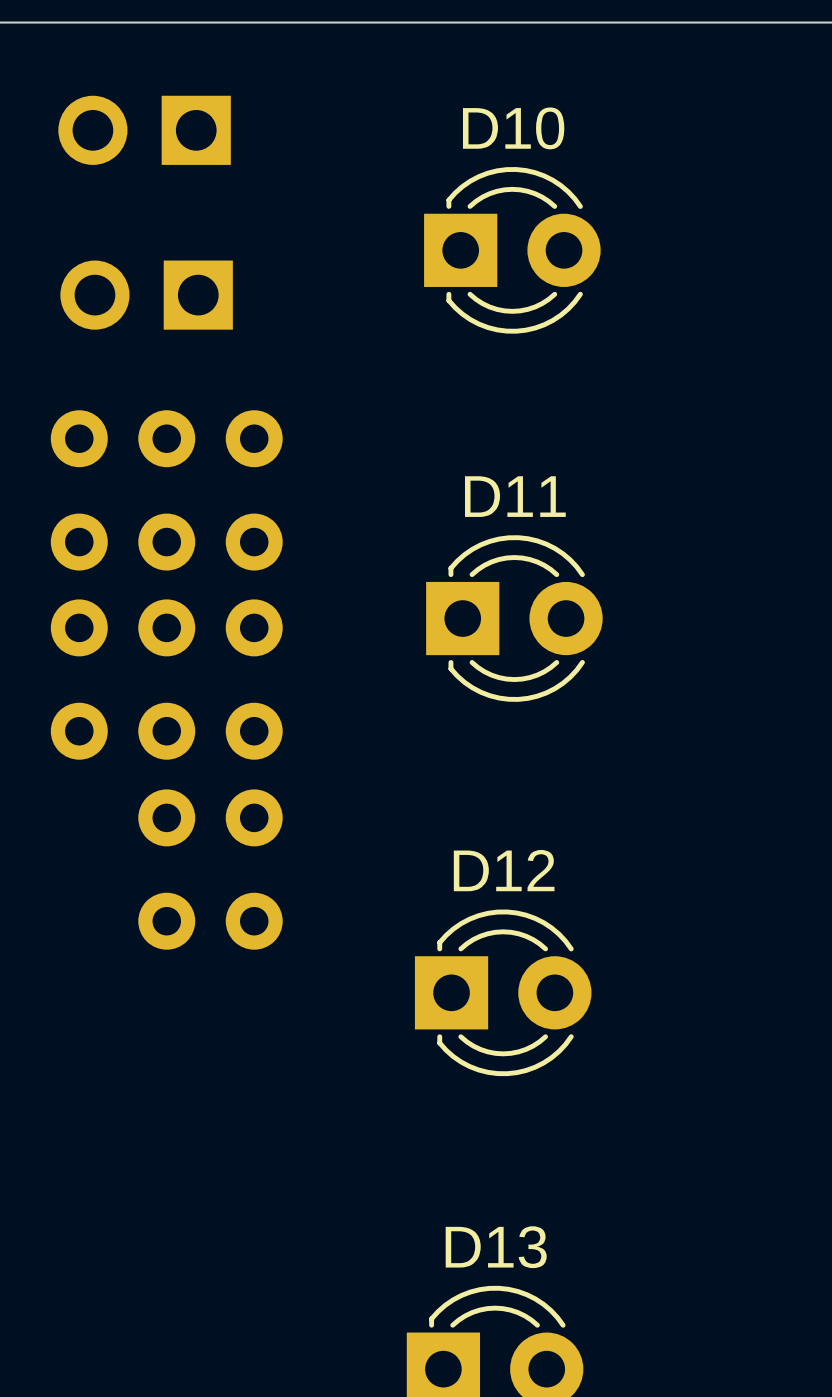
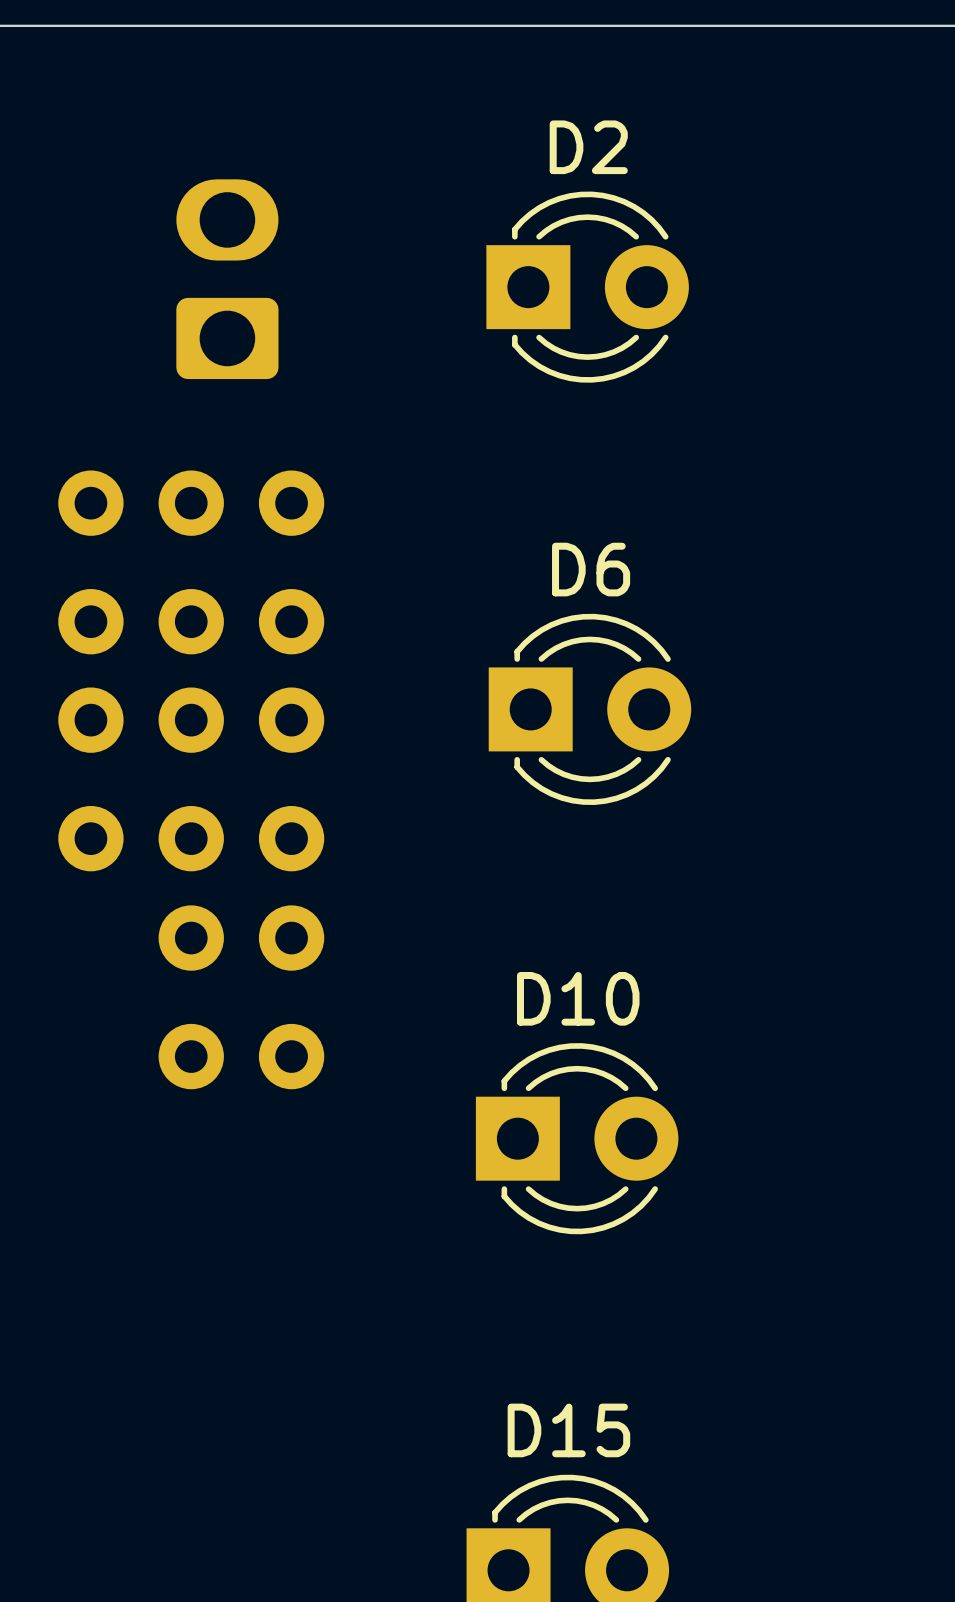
D10 name: D10 (513, 128) -> D2 (588, 147)
part: (144, 130) -> none
part: none -> (227, 279)
part: (146, 295) -> none
D11 name: D11 (515, 496) -> D6 (591, 569)
D12 name: D12 (504, 870) -> D10 (578, 998)
D13 name: D13 (496, 1247) -> D15 (568, 1430)

